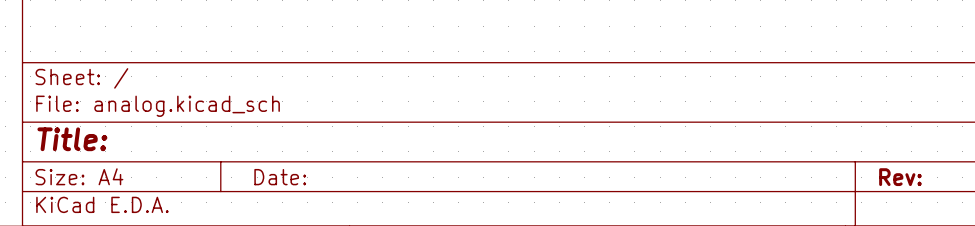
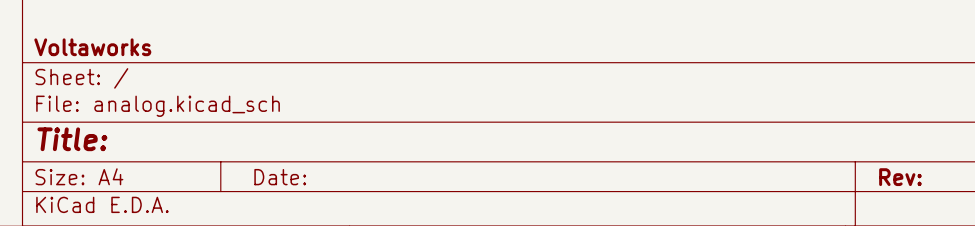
title block: none -> Voltaworks (92, 47)

